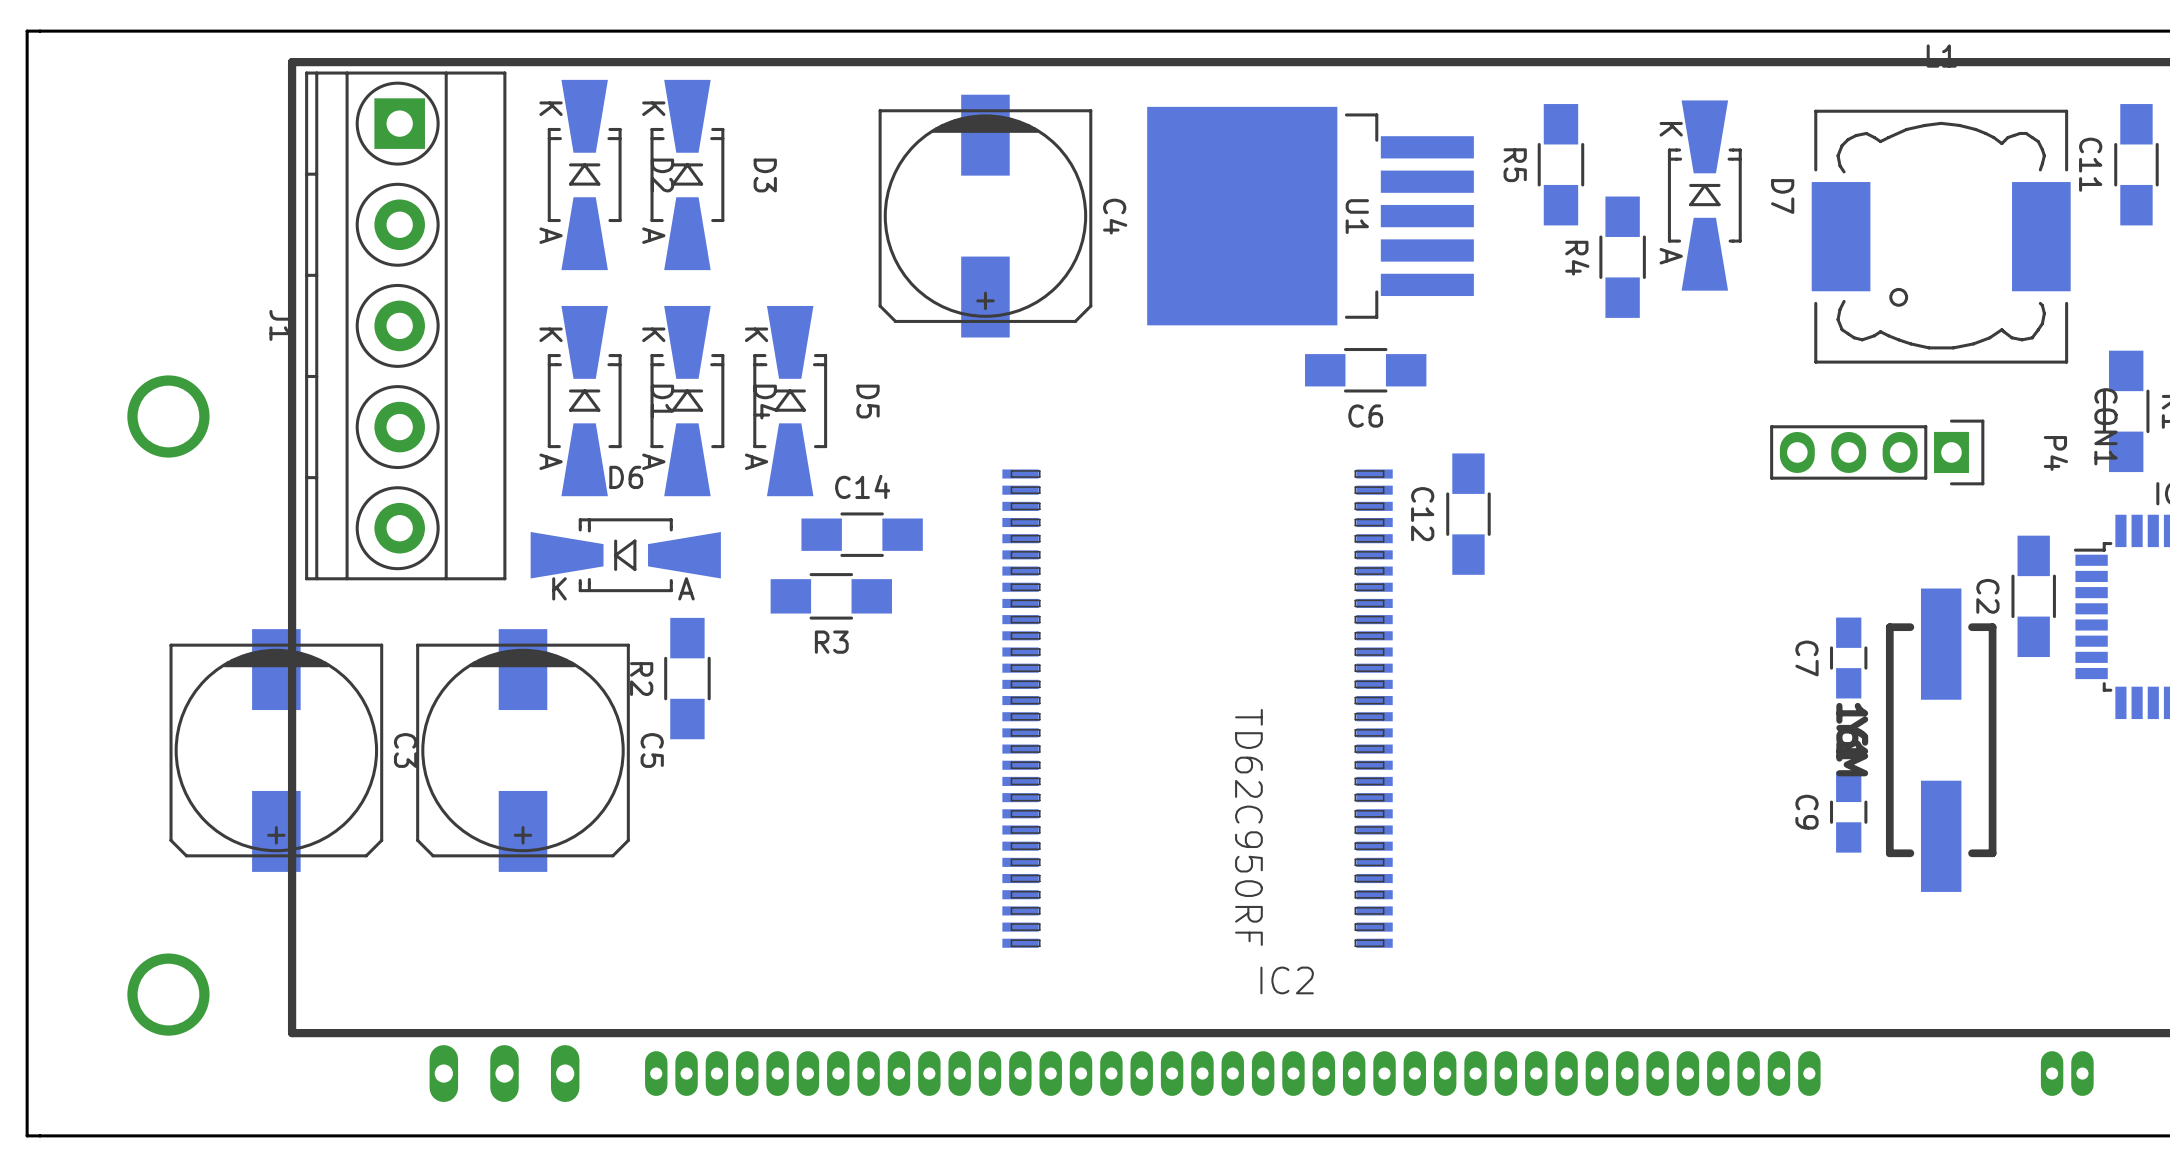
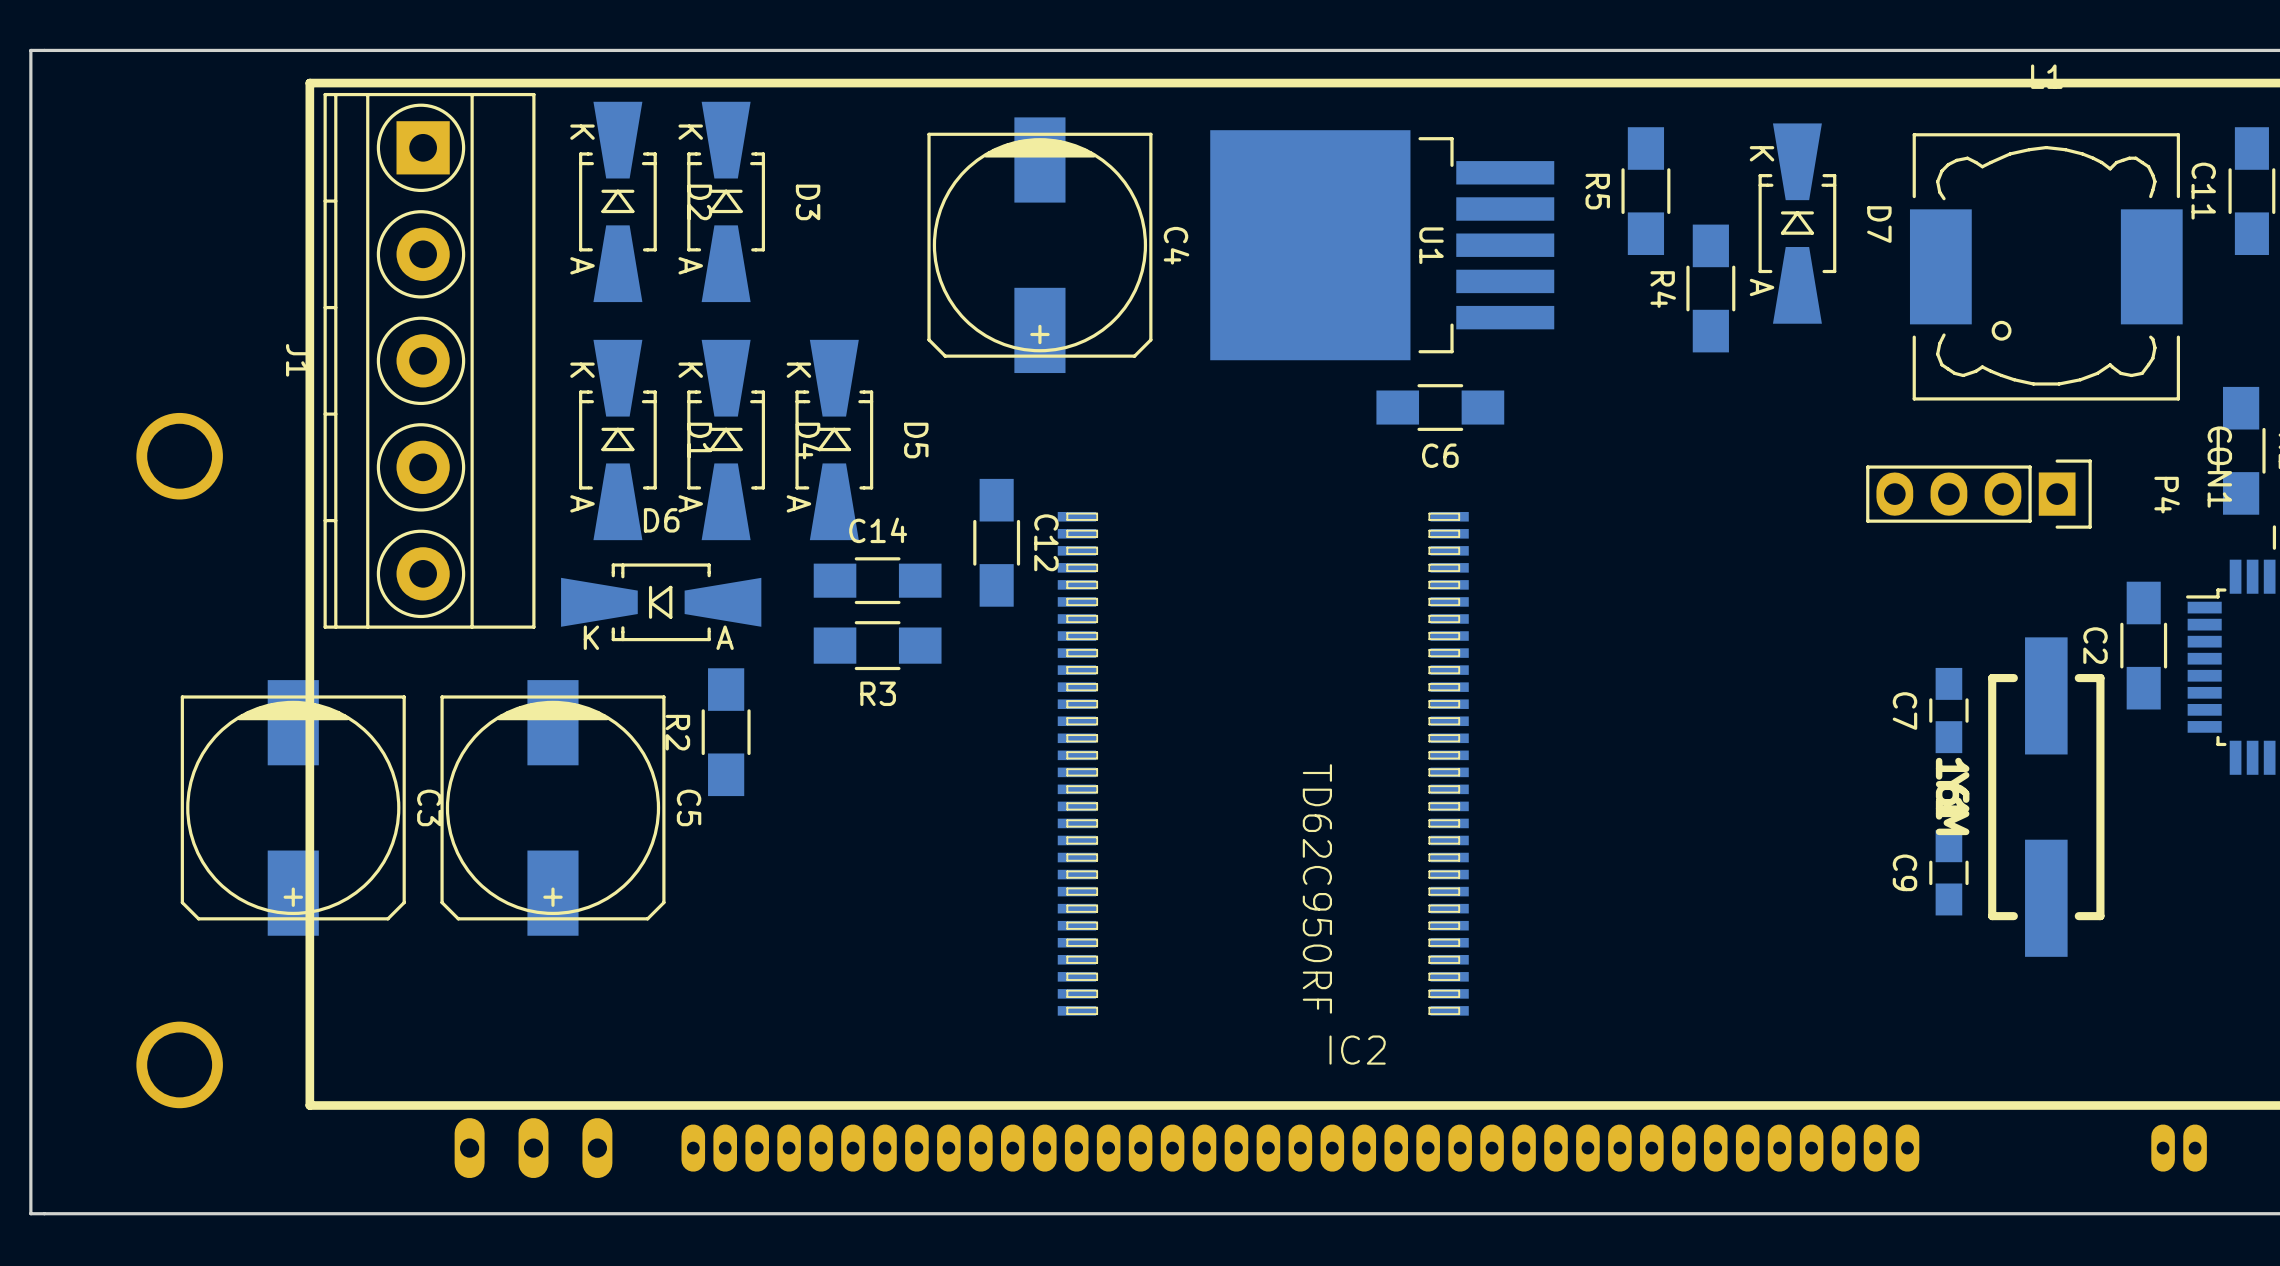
C12 name position: C12 (1422, 514) -> C12 (1046, 542)
C12 position: (1468, 514) -> (996, 542)
C14 position: (862, 534) -> (877, 580)

